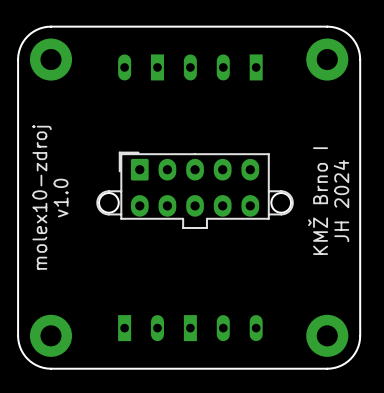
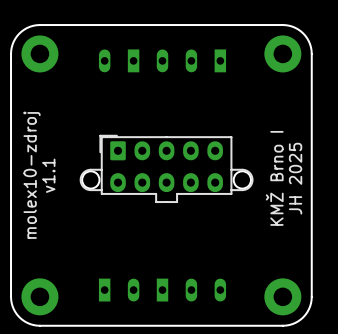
text: v1.0 (61, 198) -> v1.1 (48, 175)
text: JH 2024 (341, 201) -> JH 2025 (295, 178)

